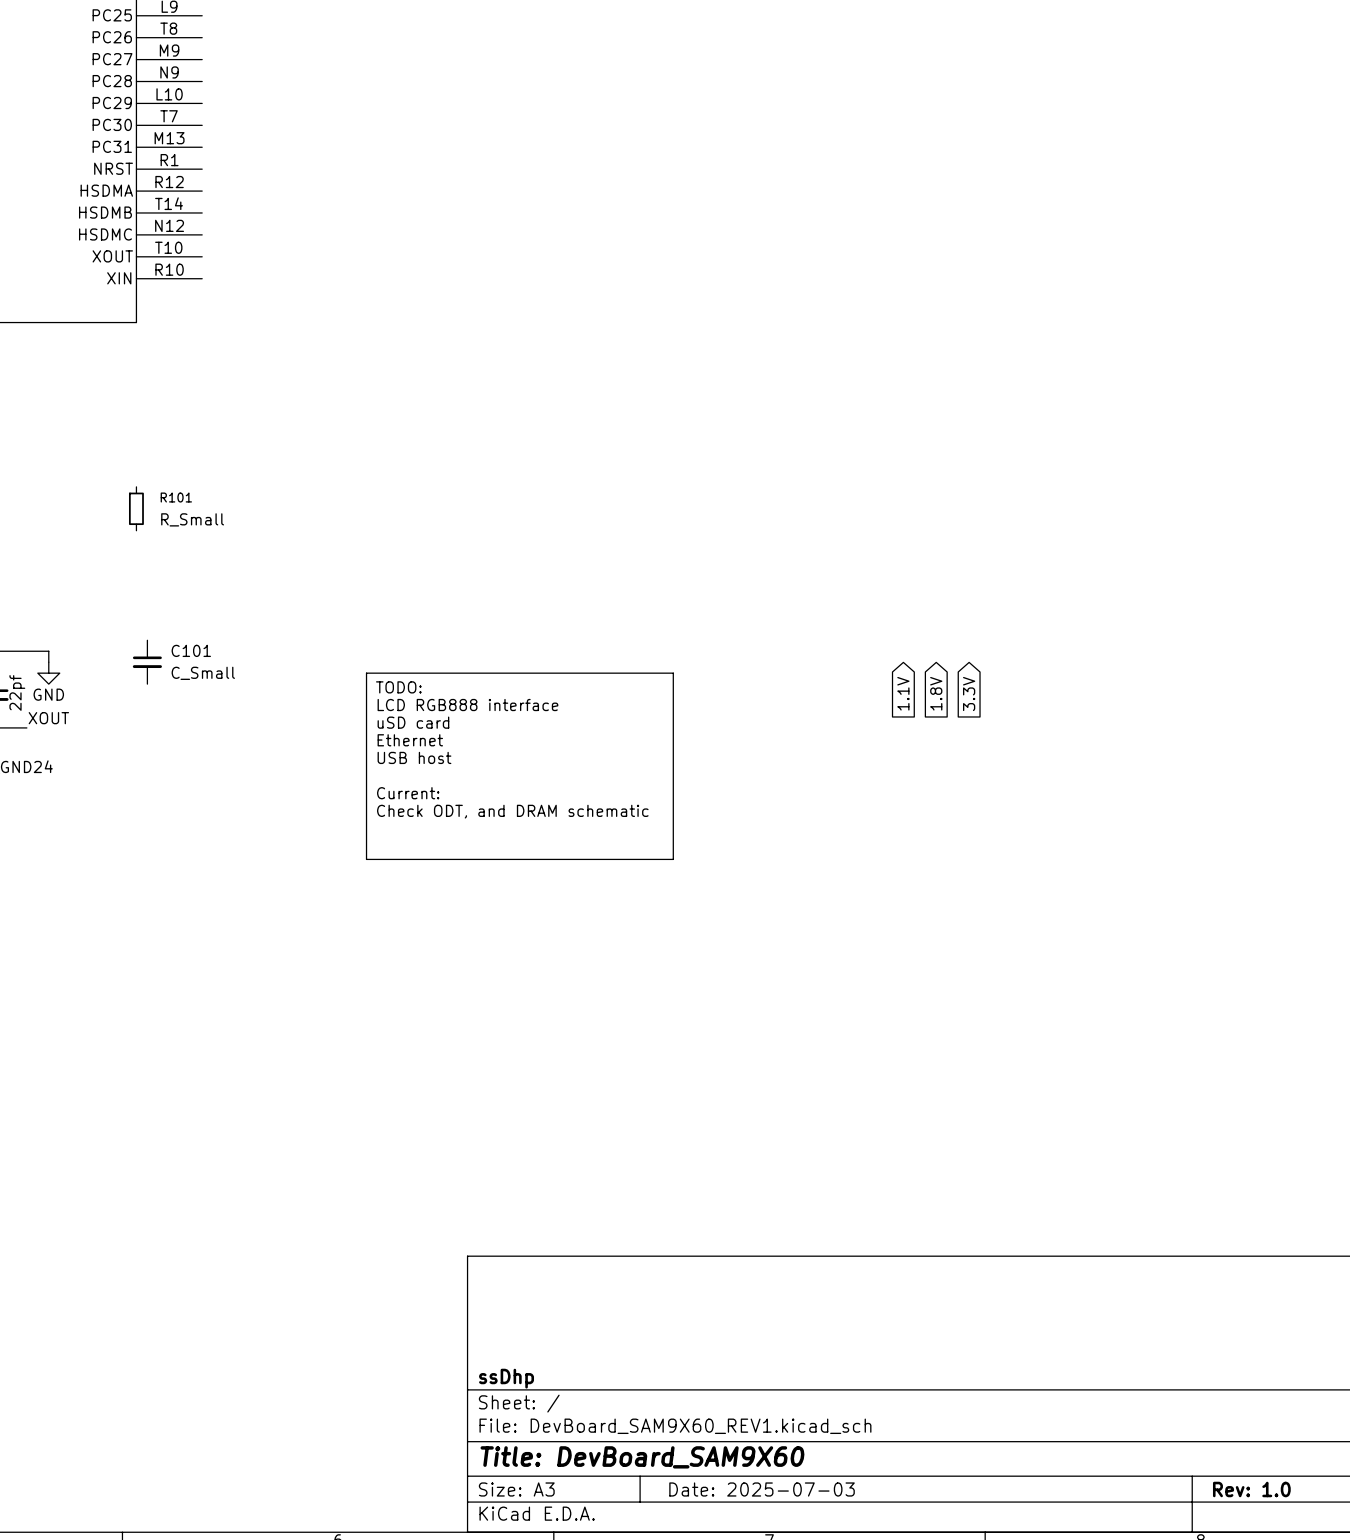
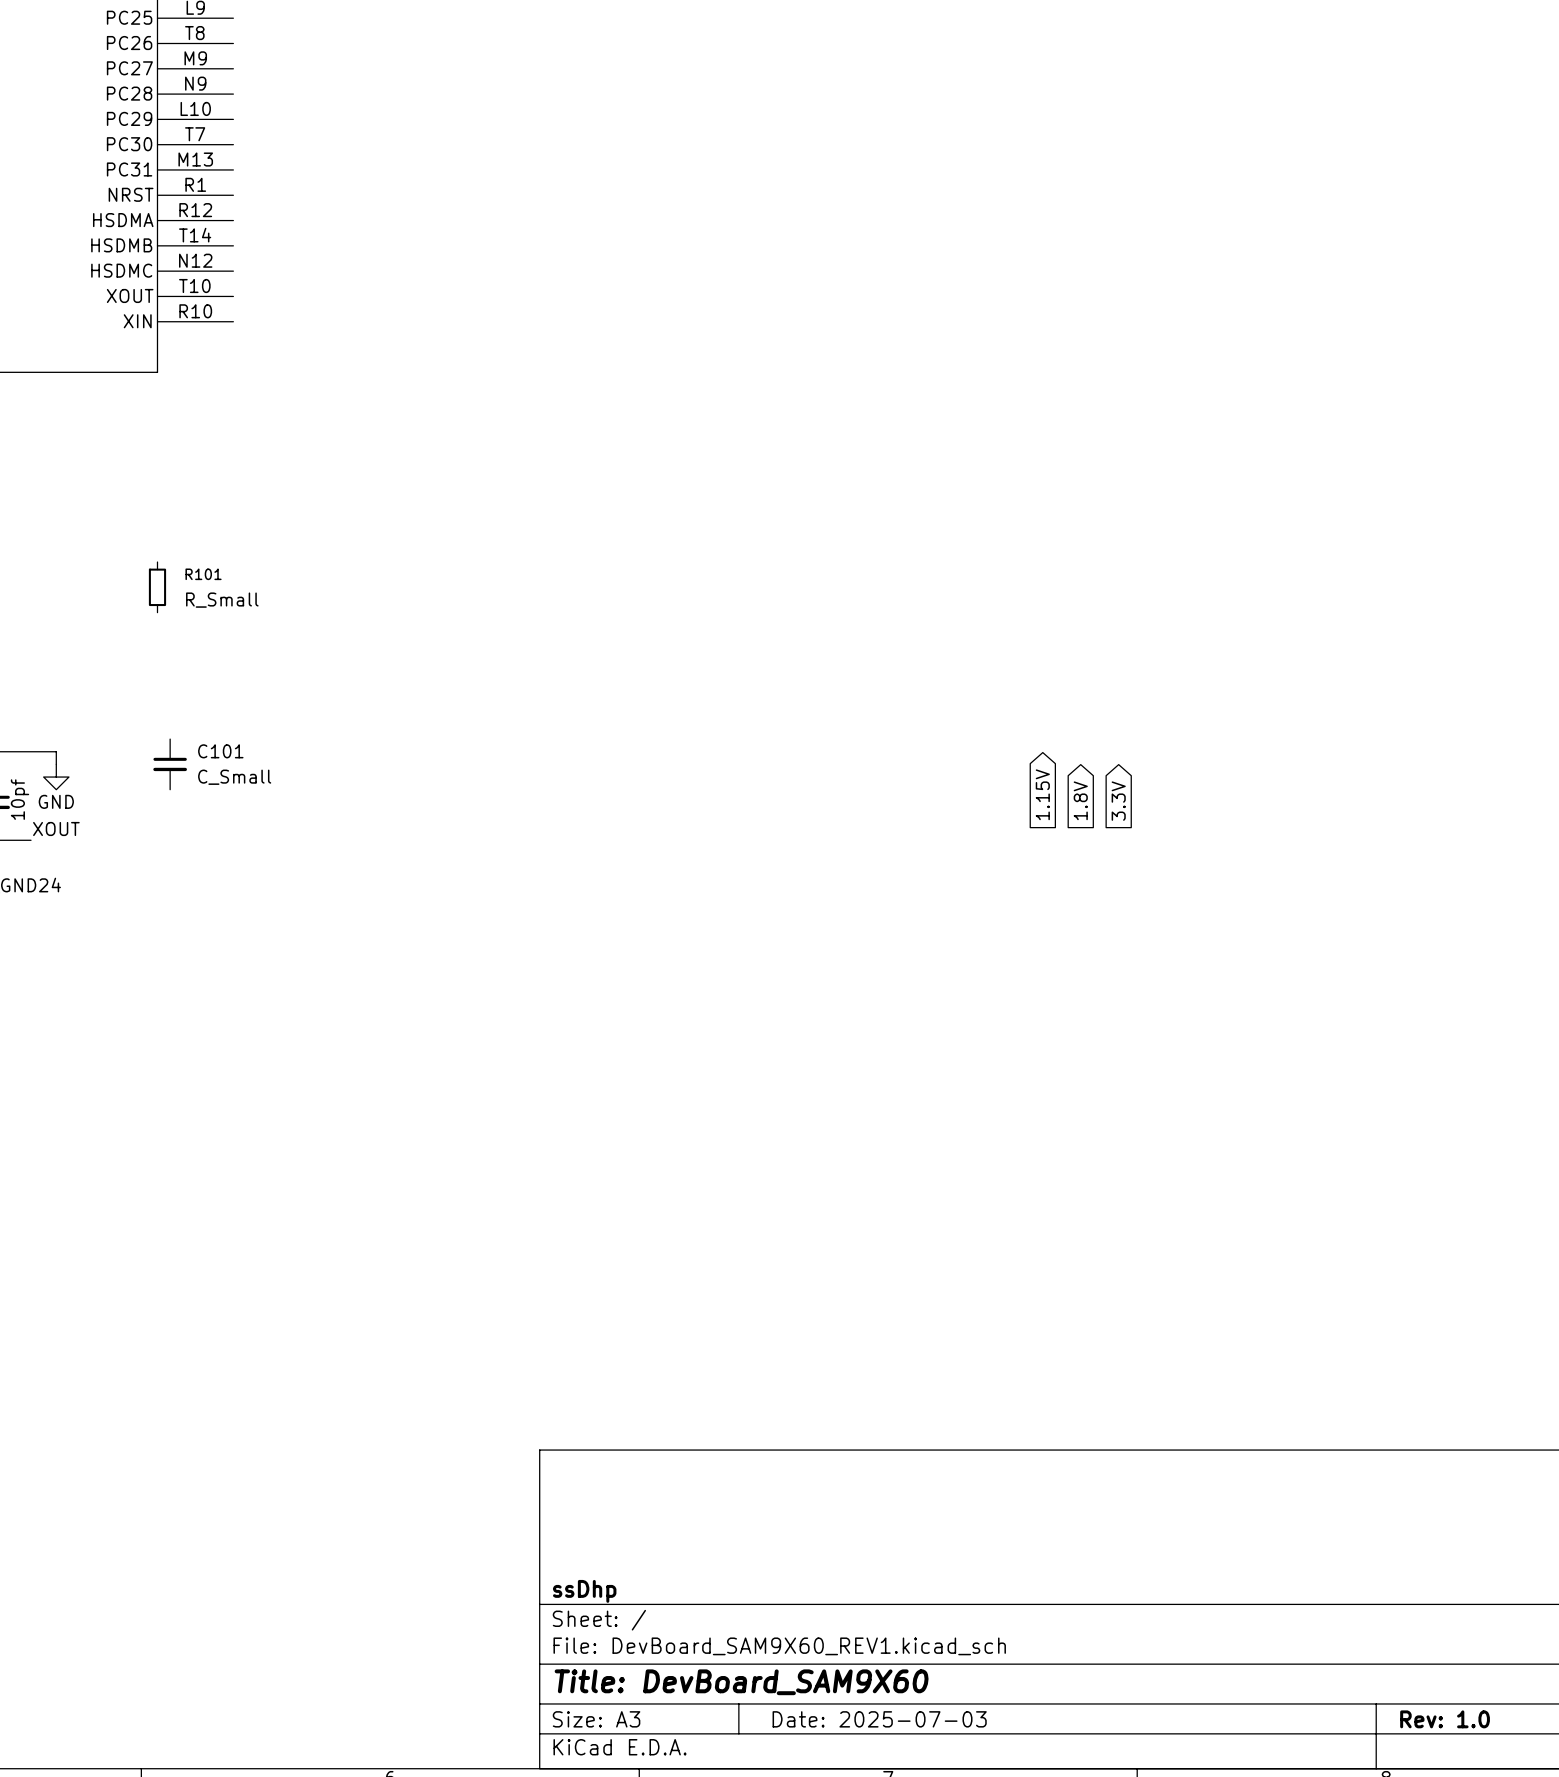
line: (366, 673) (673, 673) (673, 859) (366, 859) (366, 673) -> none
text: TODO: (398, 687) -> none
part value: 22pf (17, 692) -> 10pf (20, 799)
global label: 1.1V (903, 693) -> 1.15V (1042, 794)
text: LCD RGB888 interface (467, 705) -> none
text: uSD card (413, 722) -> none
text: Ethernet (410, 740) -> none
text: USB host (414, 757) -> none
text: Current: (408, 793) -> none
text: Check ODT, and DRAM schematic (512, 811) -> none

